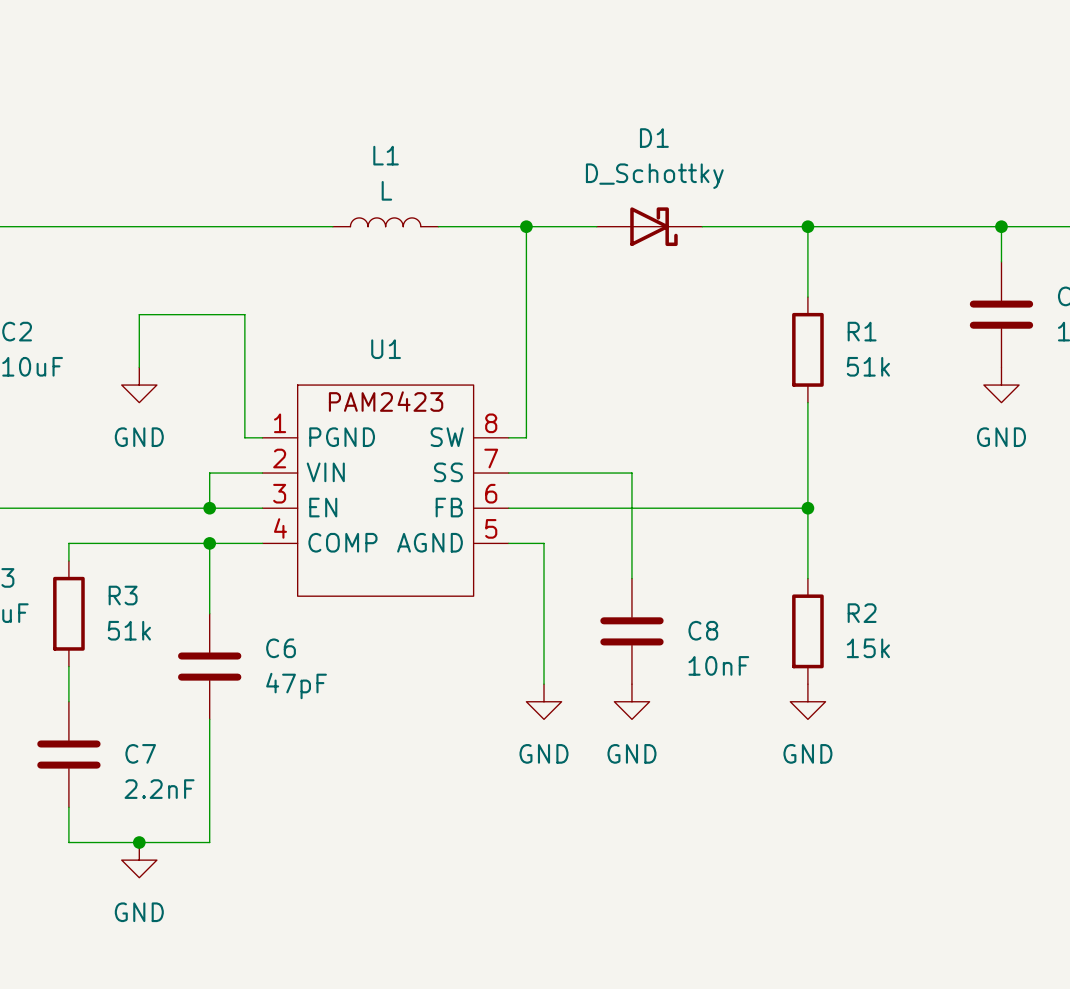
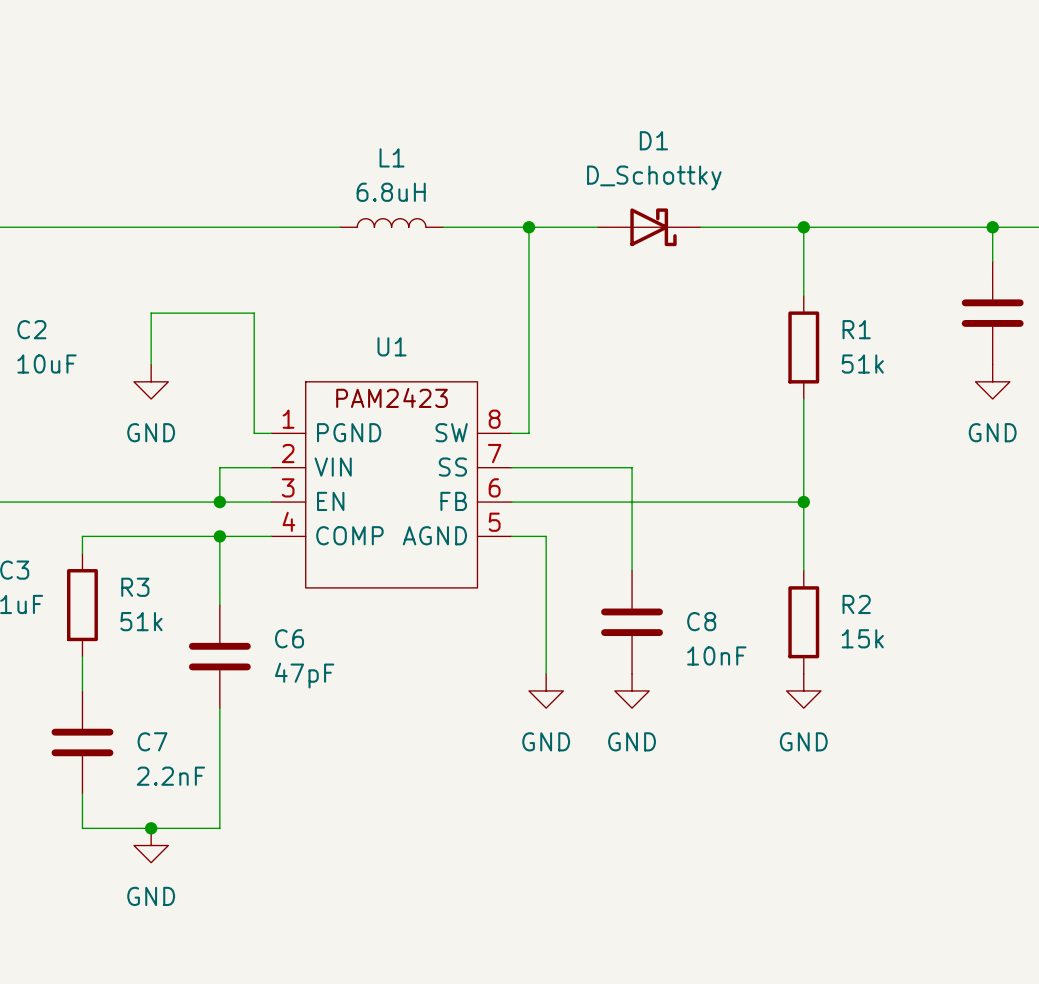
L1 value: L (386, 190) -> 6.8uH (391, 192)

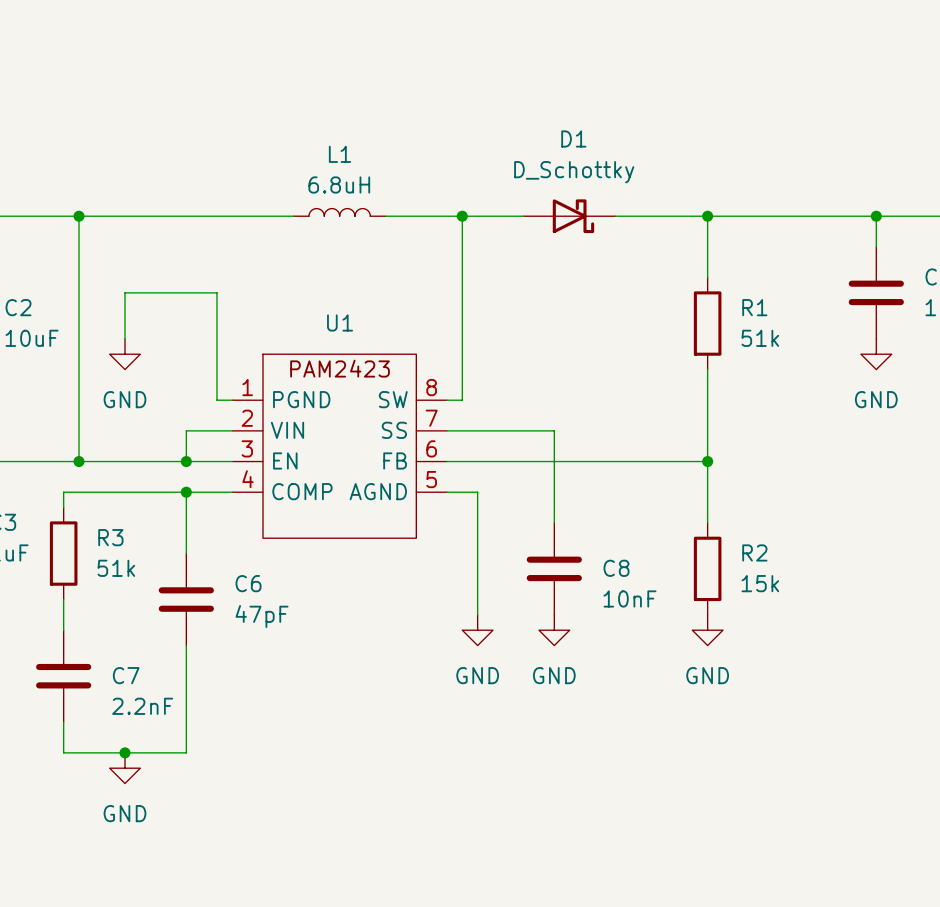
wire: none -> (79, 216) (79, 461)
junction: none -> (79, 216)
junction: none -> (79, 461)

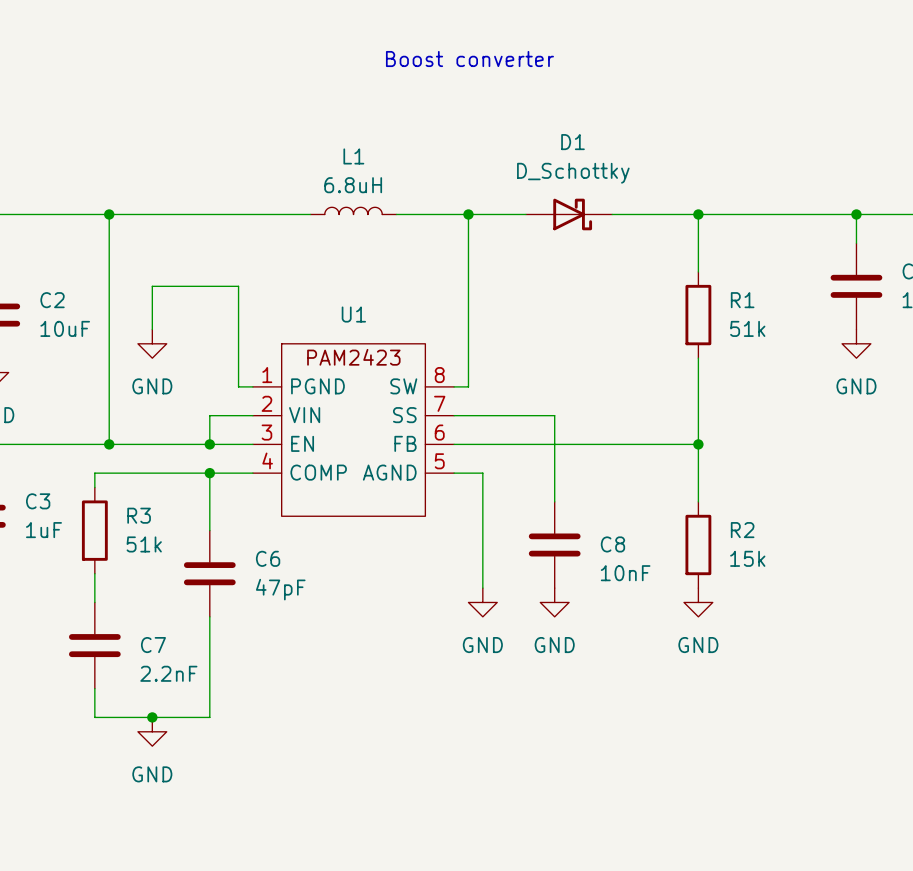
text: none -> Boost converter (469, 59)

